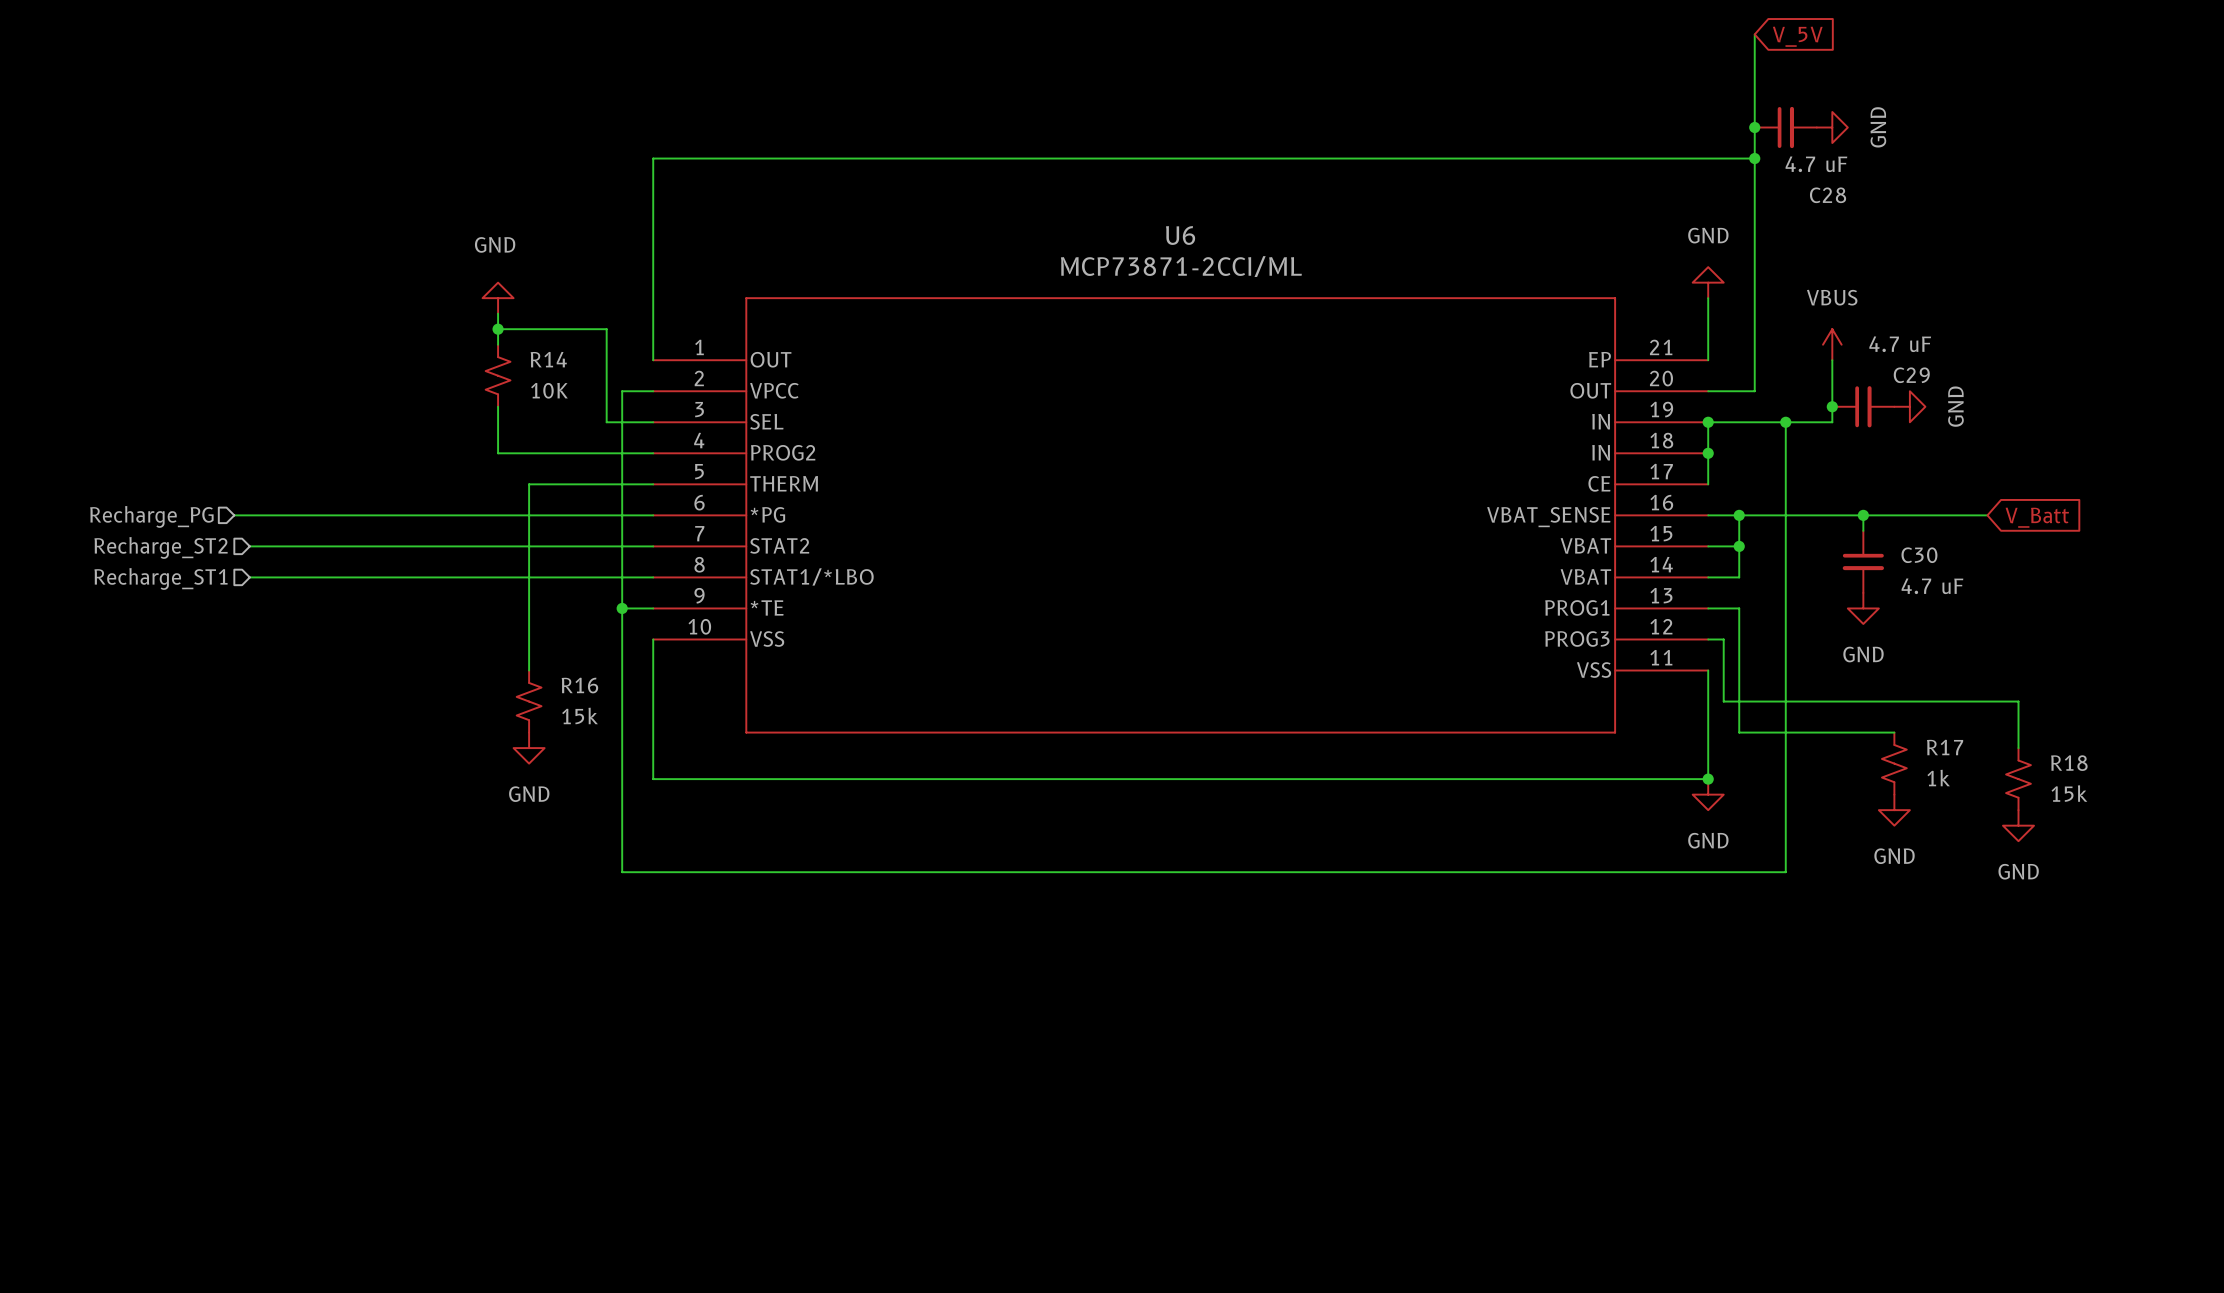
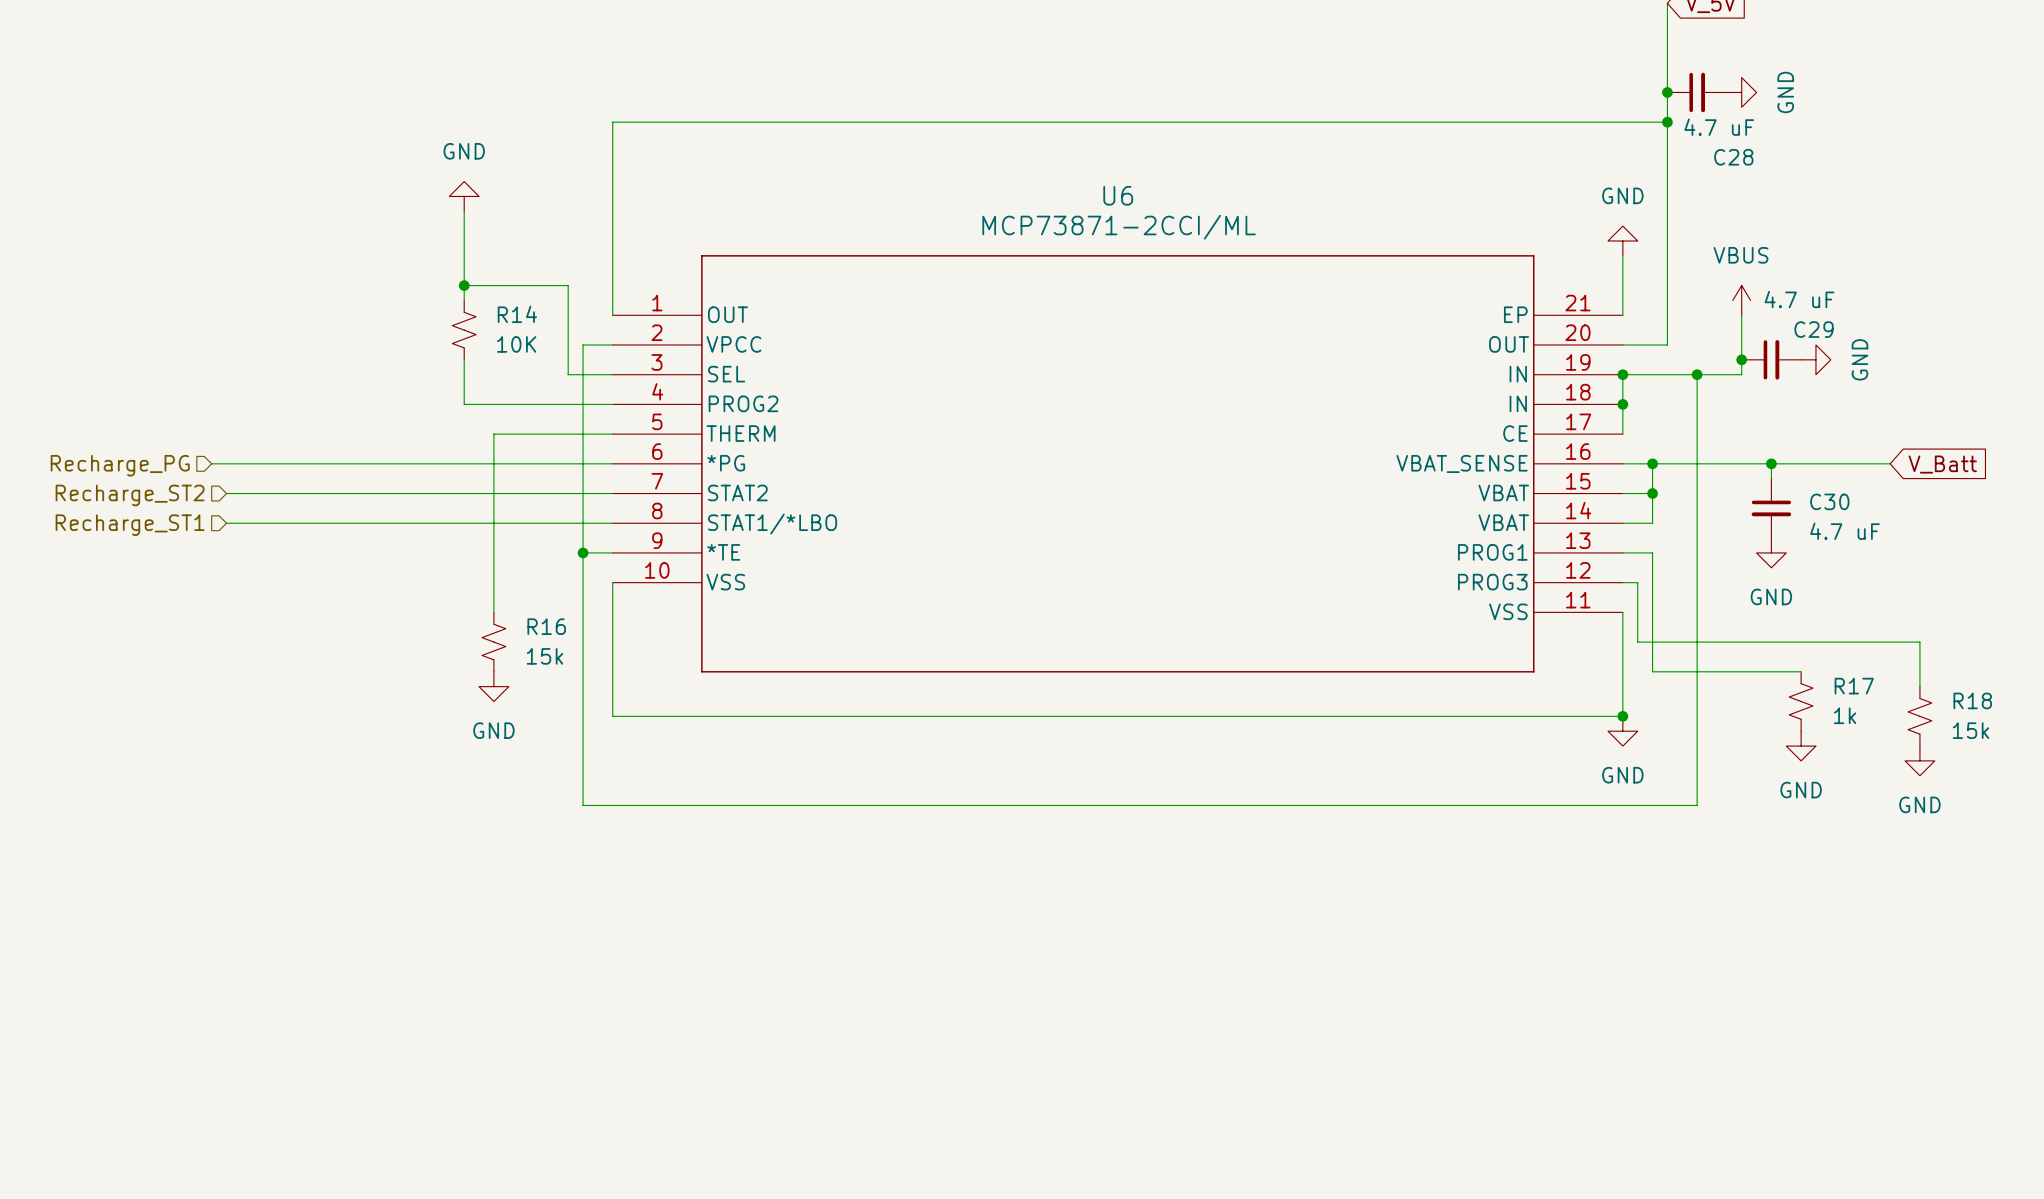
power symbol text position: GND (495, 244) -> GND (464, 151)
wire: none -> (464, 211) (464, 270)
power symbol position: GND (498, 298) -> GND (464, 196)

